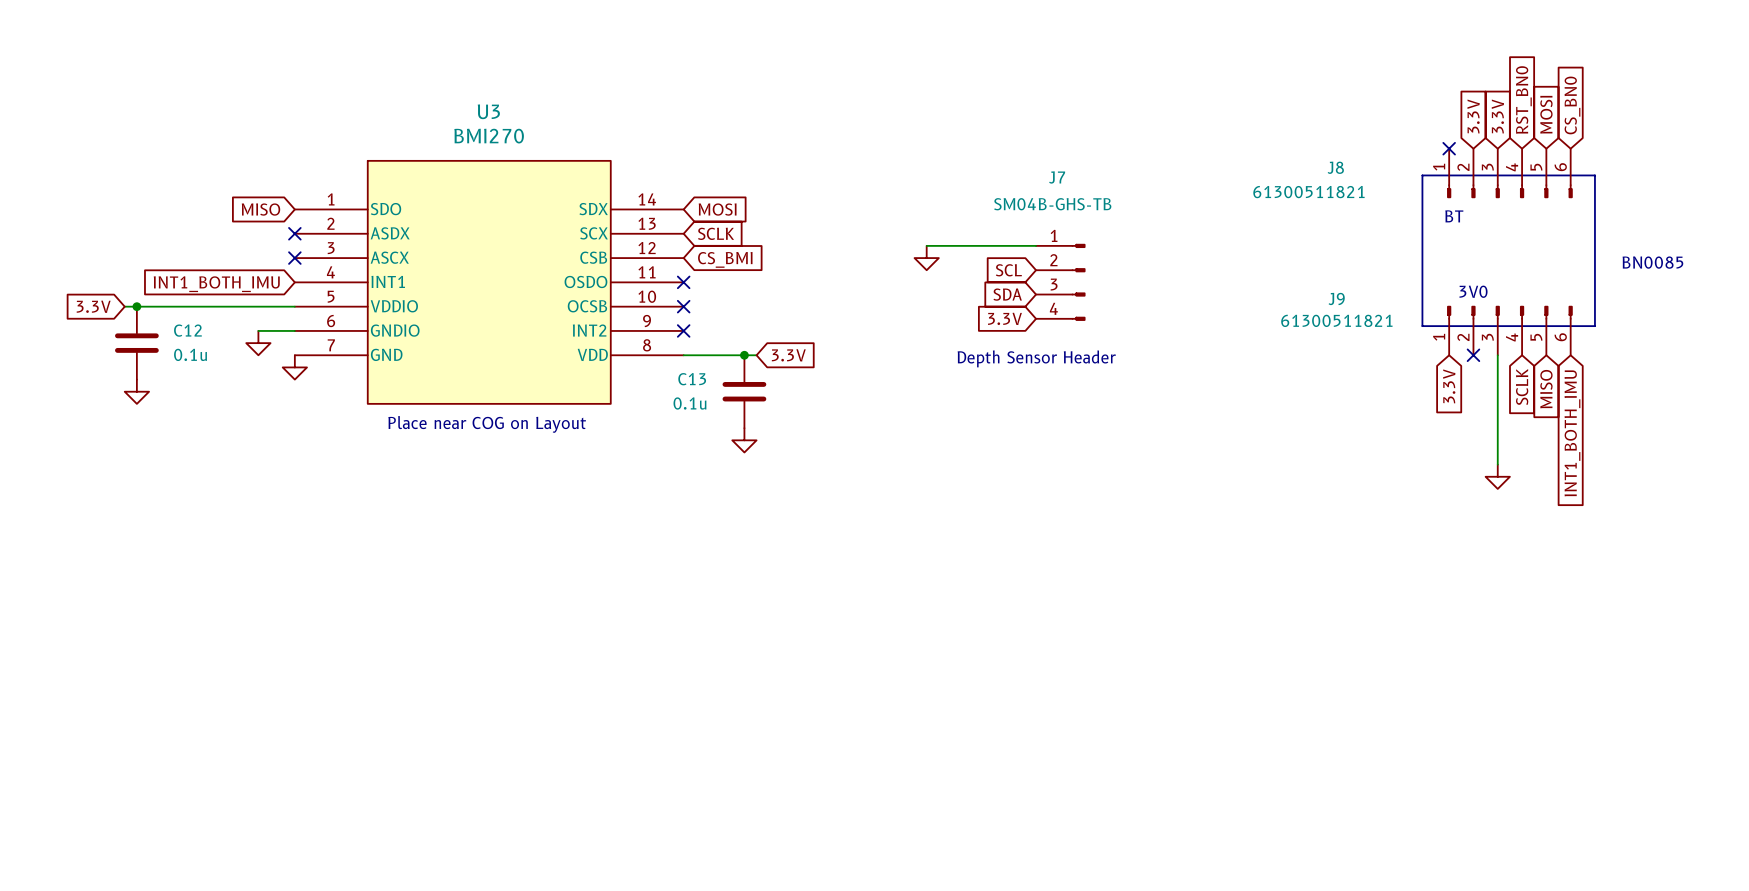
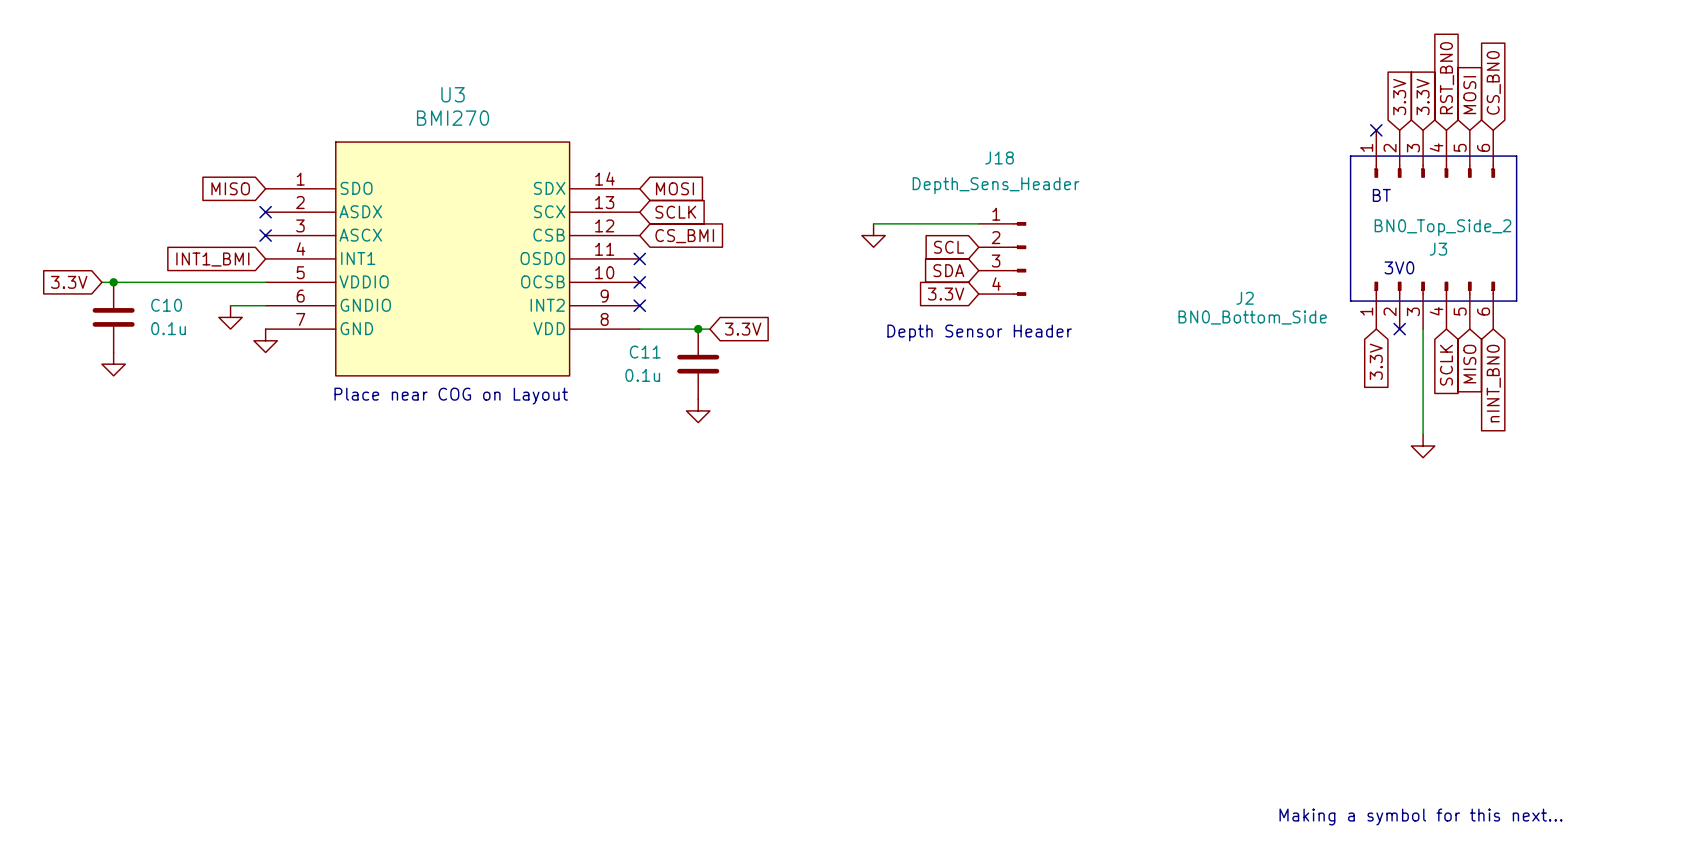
J8 name: J8 (1335, 167) -> J3 (1438, 249)
J7 name: J7 (1057, 177) -> J18 (999, 157)
J8 value: 61300511821 (1308, 192) -> BN0_Top_Side_2 (1442, 227)
J7 value: SM04B-GHS-TB (1052, 204) -> Depth_Sens_Header (996, 185)
text: BN0085 (1652, 262) -> none
global label: INT1_BOTH_IMU (216, 284) -> INT1_BMI (212, 259)
J9 name: J9 (1336, 298) -> J2 (1245, 298)
J9 value: 61300511821 (1336, 320) -> BN0_Bottom_Side (1252, 317)
C12 name: C12 (187, 330) -> C10 (166, 305)
C13 name: C13 (692, 379) -> C11 (645, 352)
global label: INT1_BOTH_IMU (1572, 433) -> nINT_BN0 (1493, 383)
text: none -> Making a symbol for this next... (1421, 817)

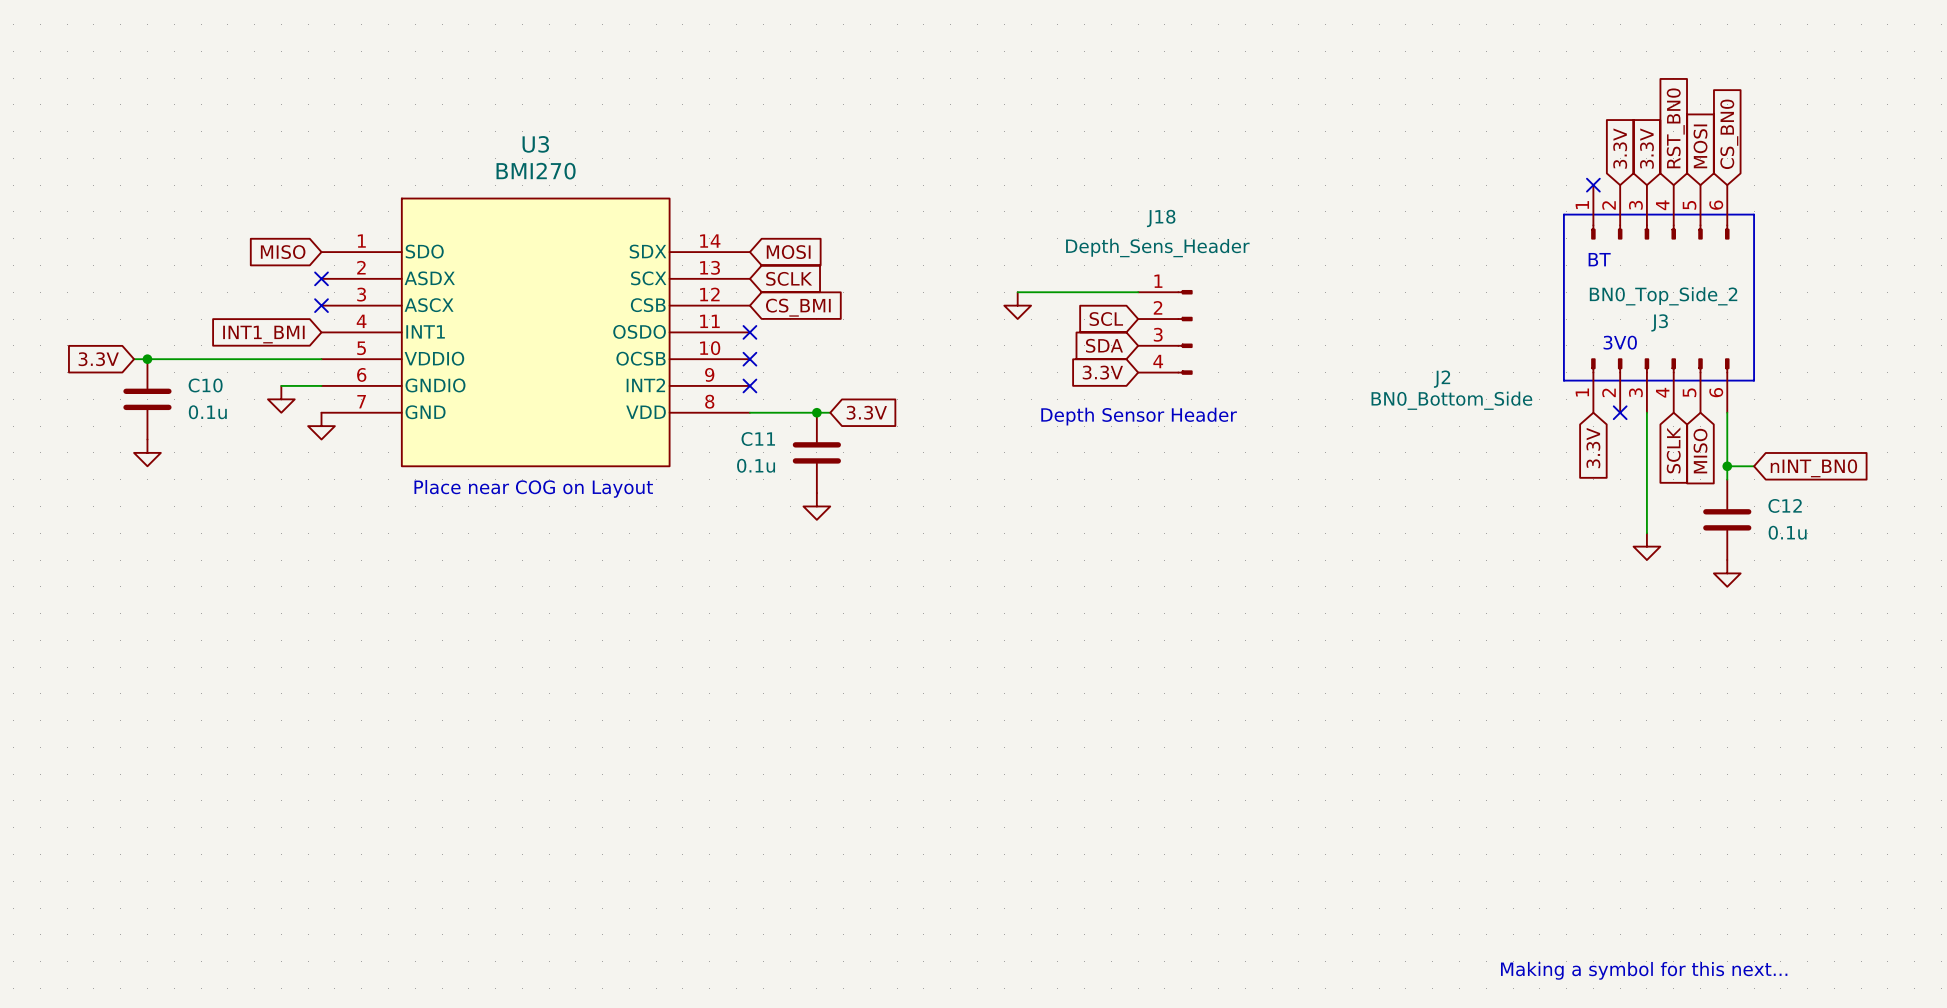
wire: none -> (1727, 412) (1727, 479)
wire: none -> (1727, 466) (1754, 466)
junction: none -> (1727, 466)
global label rotation: 0° (1493, 383) -> 90° counterclockwise (1813, 468)
C12: none -> 0.1u (1727, 519)
power symbol: none -> (1727, 573)

